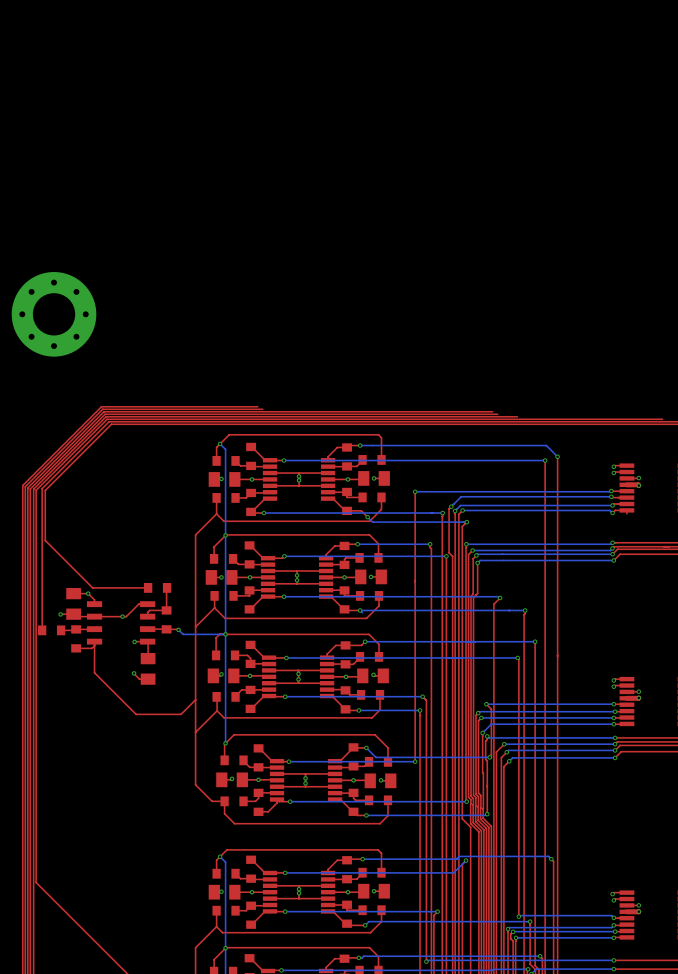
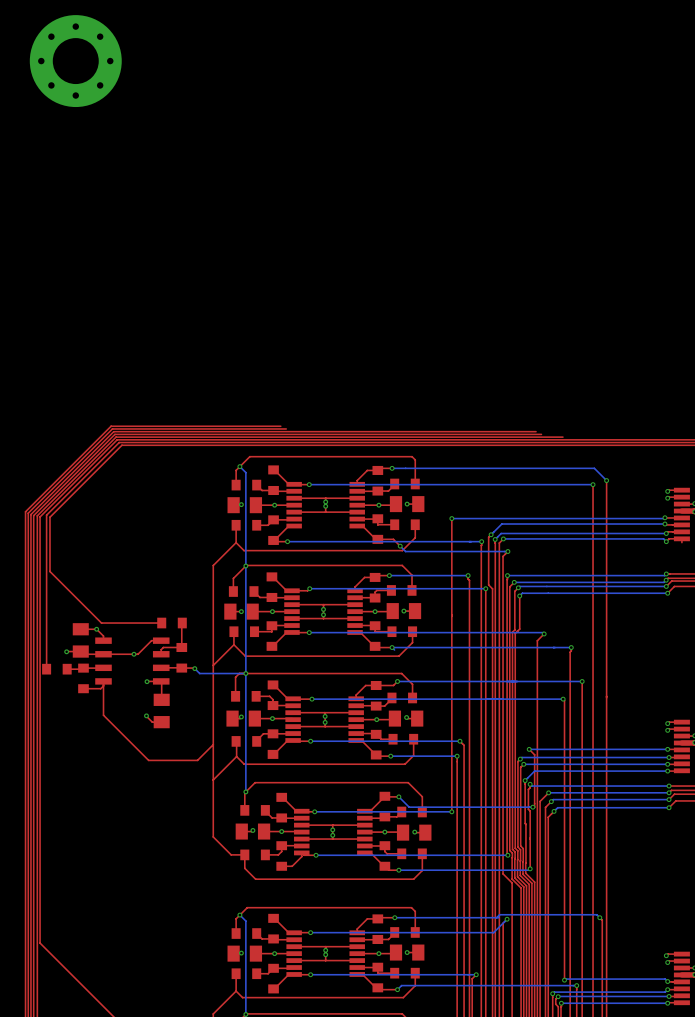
part position: (54, 314) -> (75, 61)

